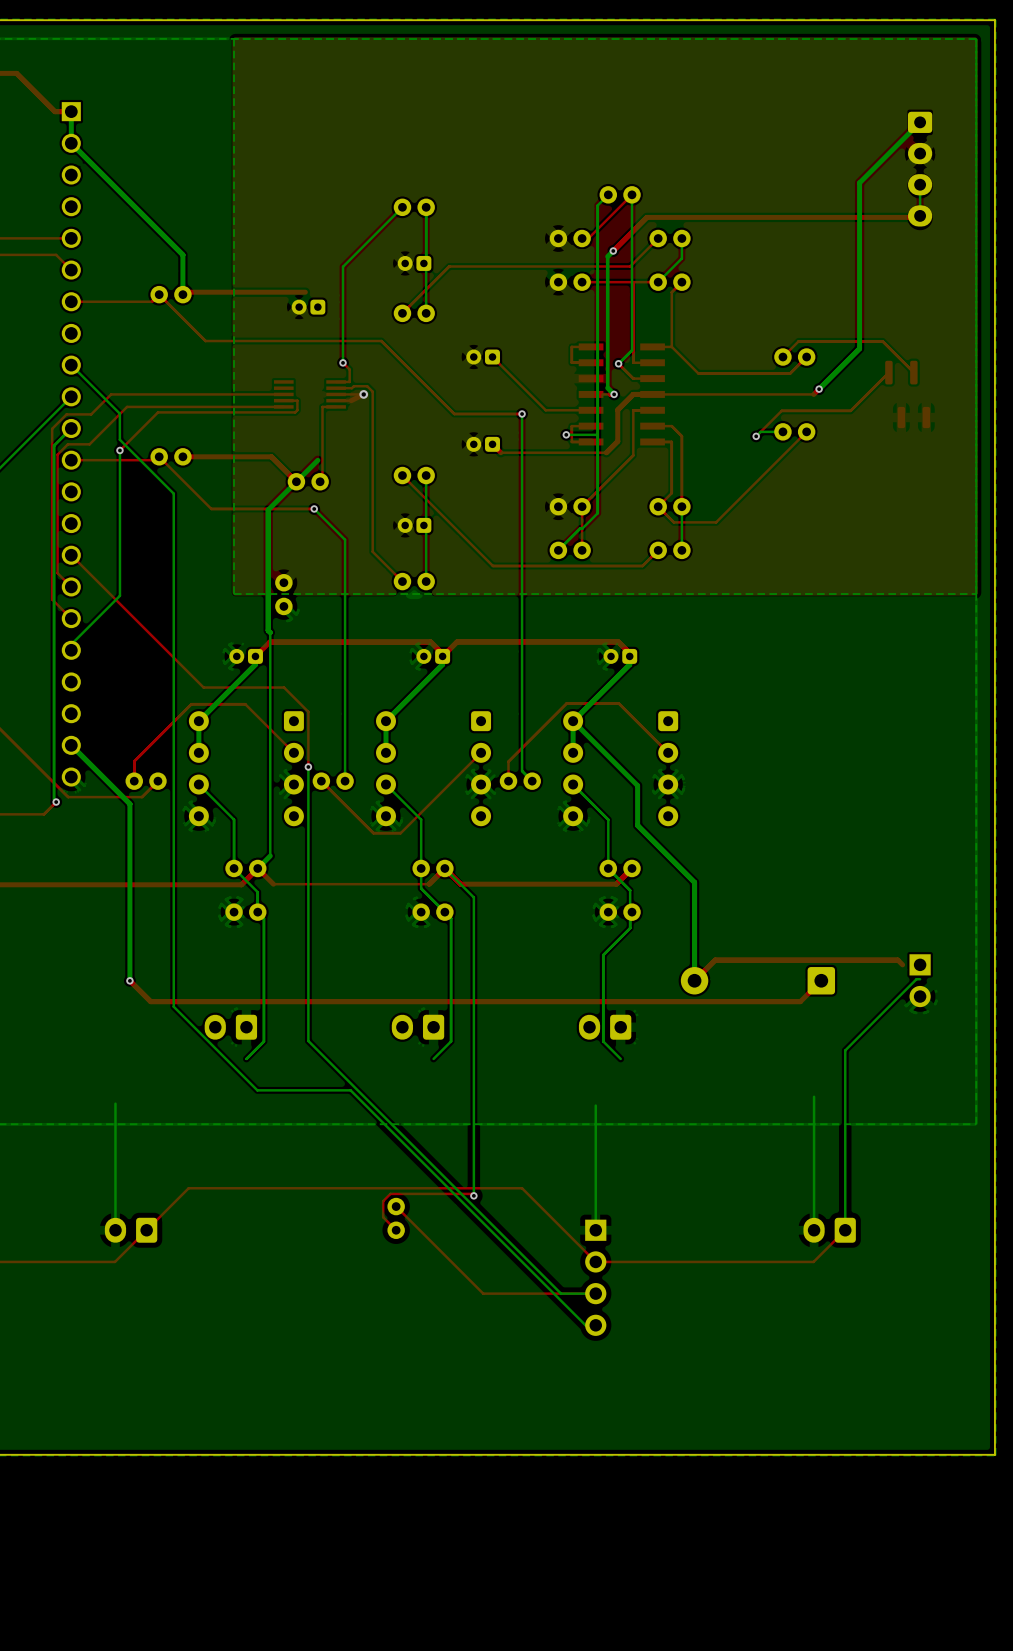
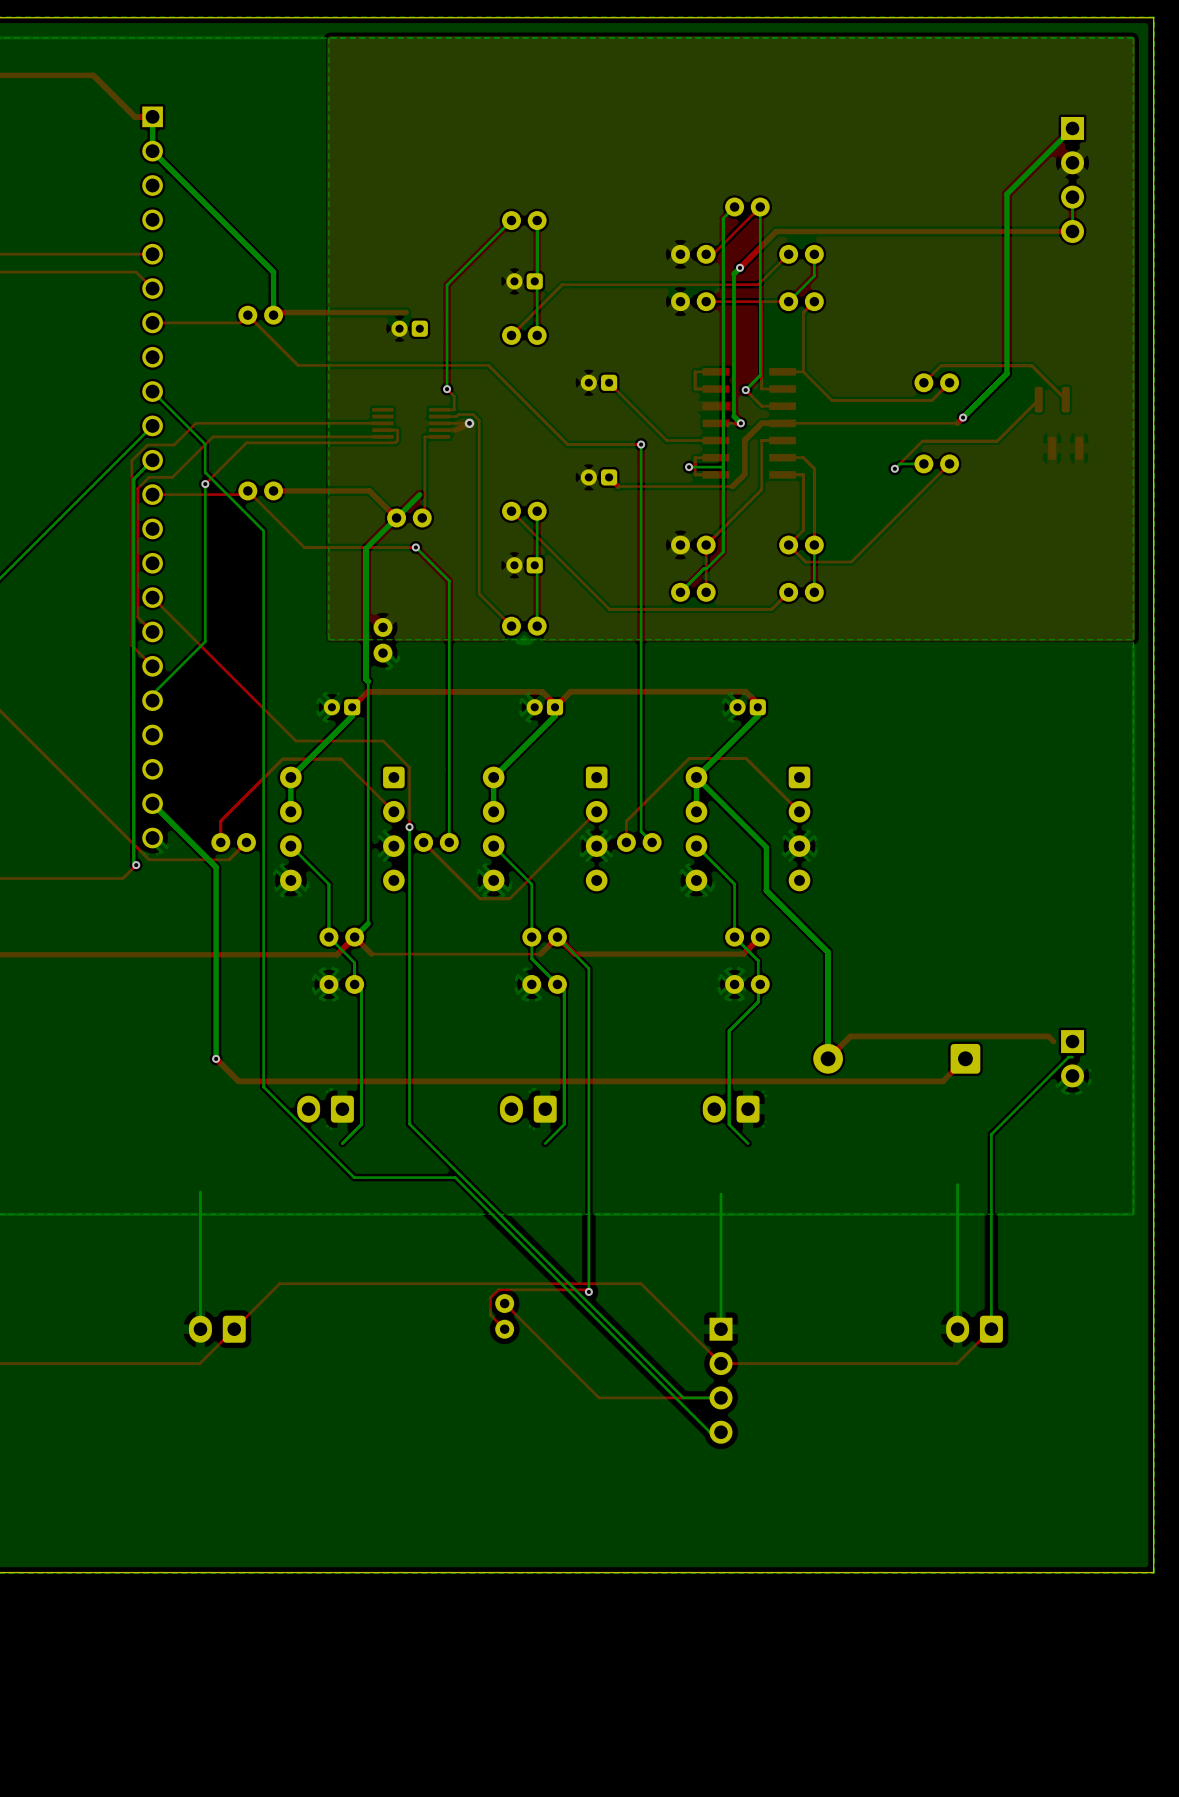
part footprint: [907, 111, 933, 227] -> [1061, 116, 1085, 243]

